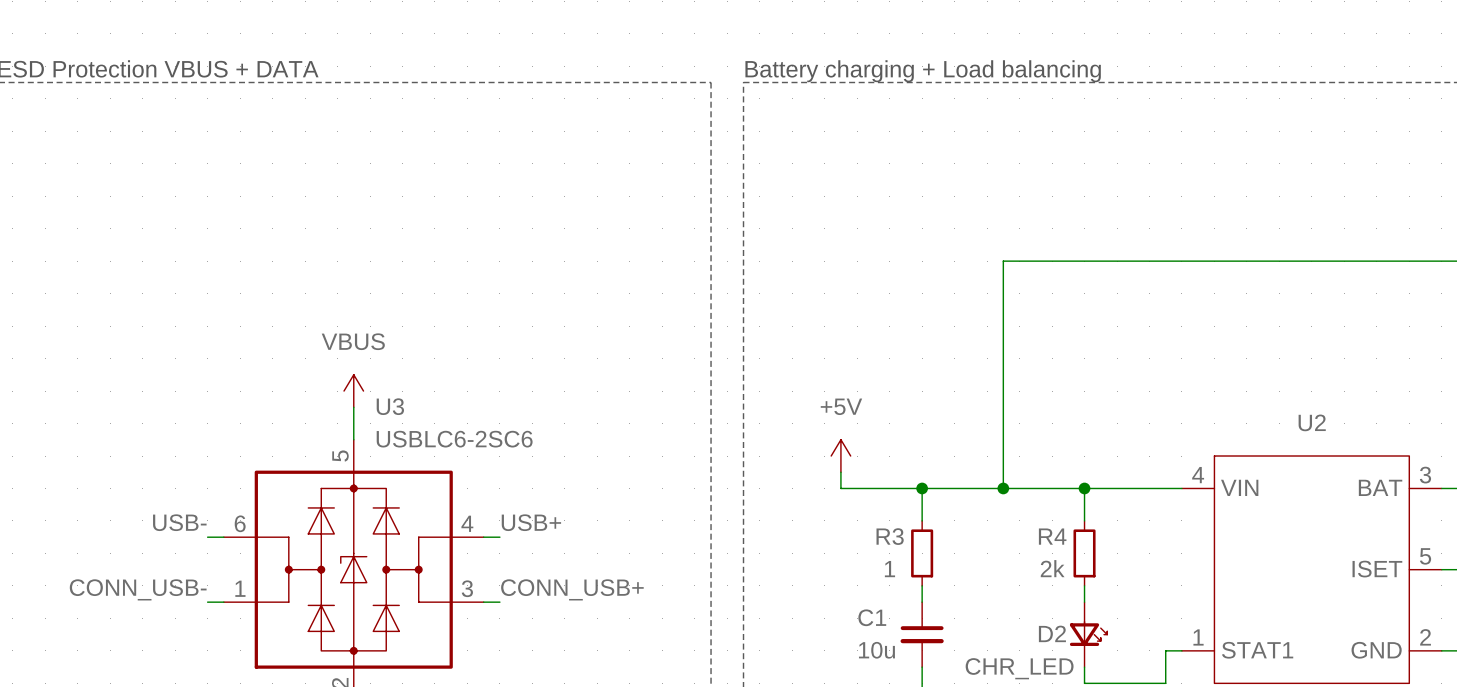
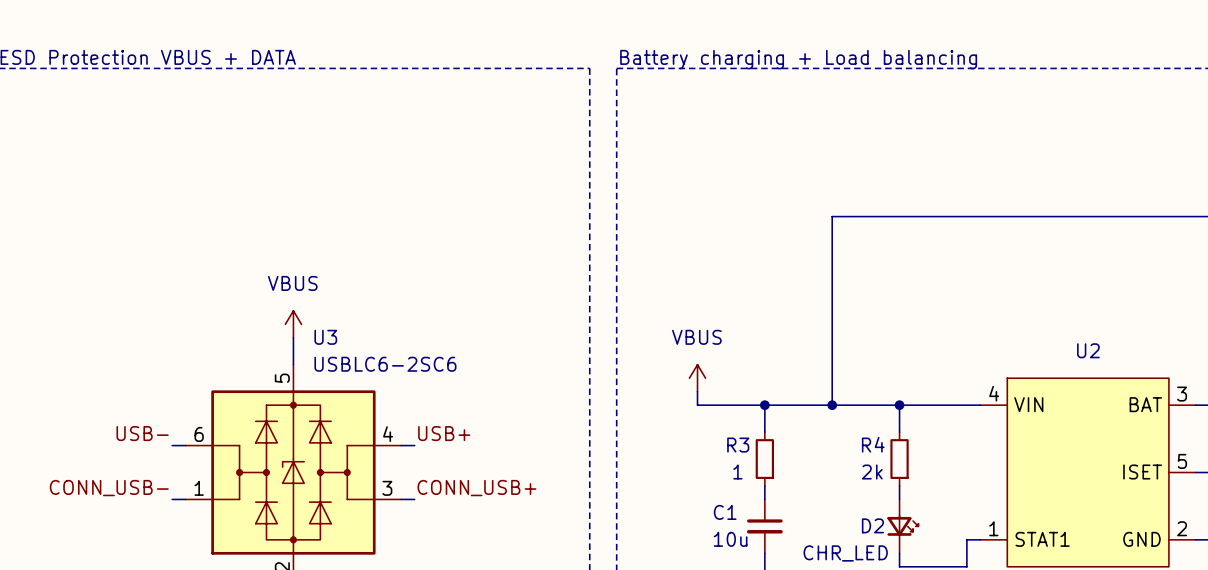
power symbol: +5V (840, 456) -> VBUS (697, 378)

